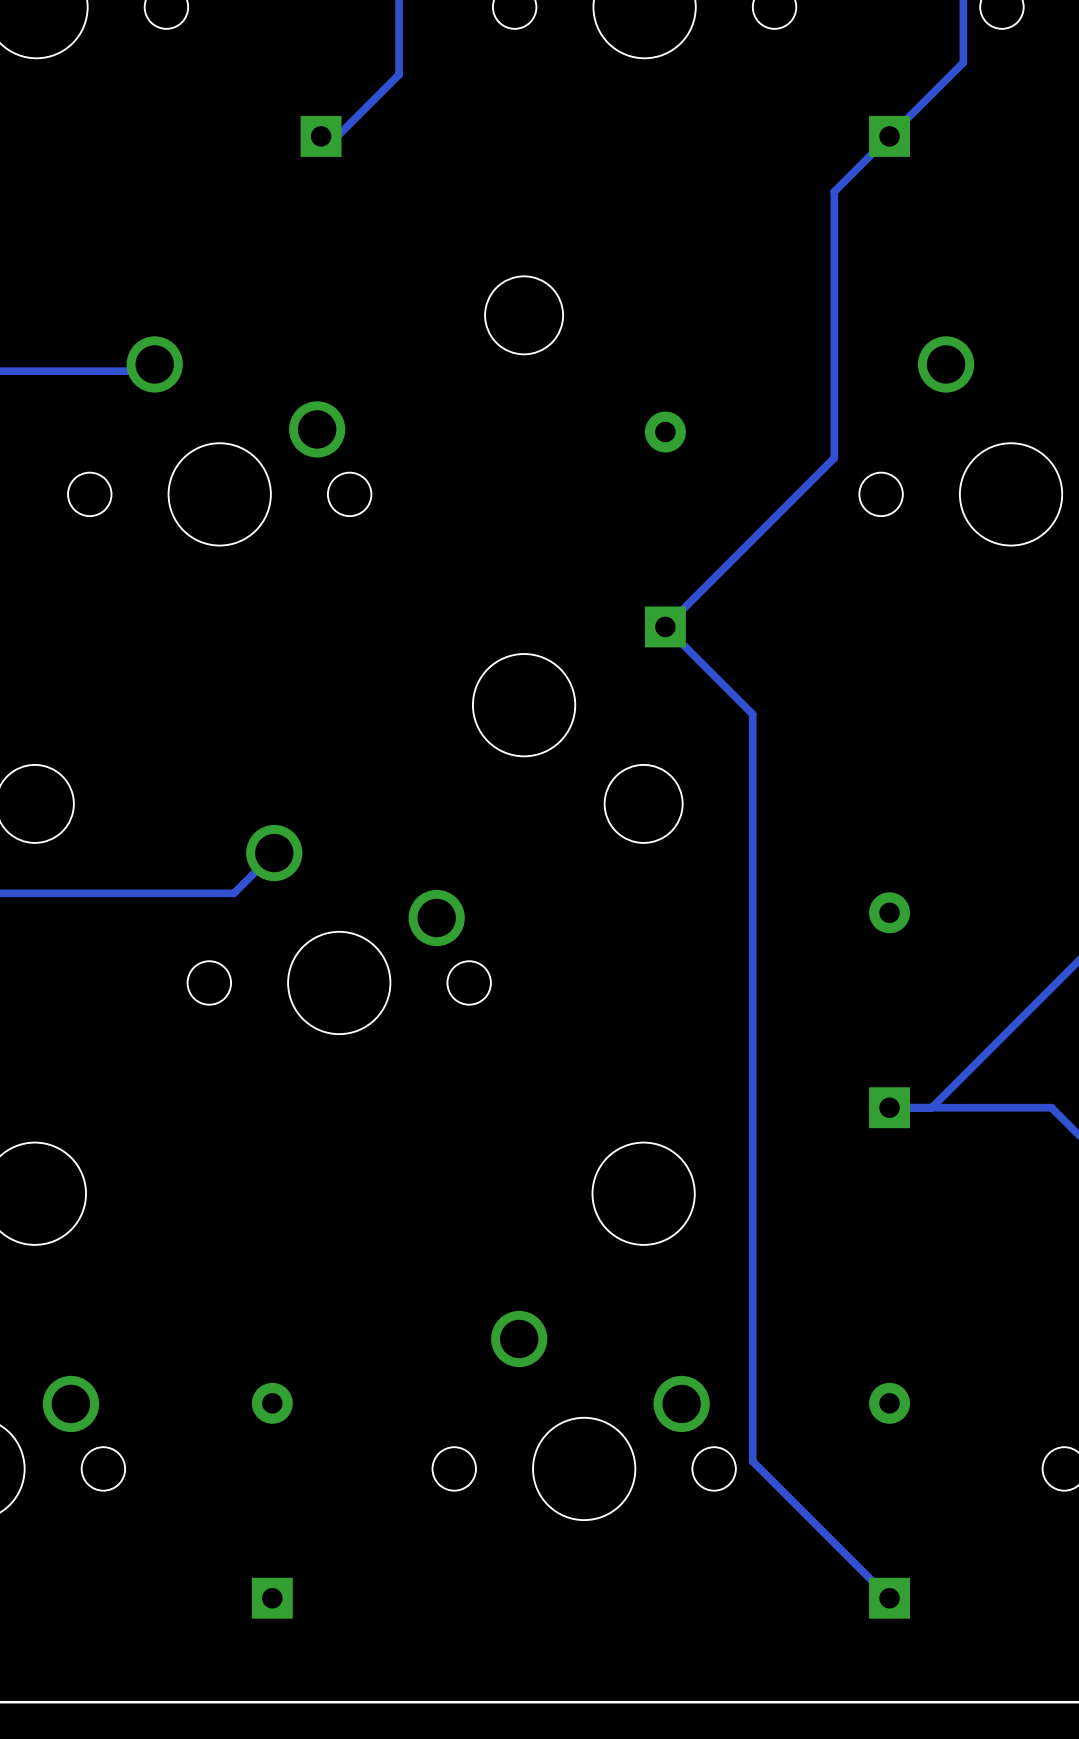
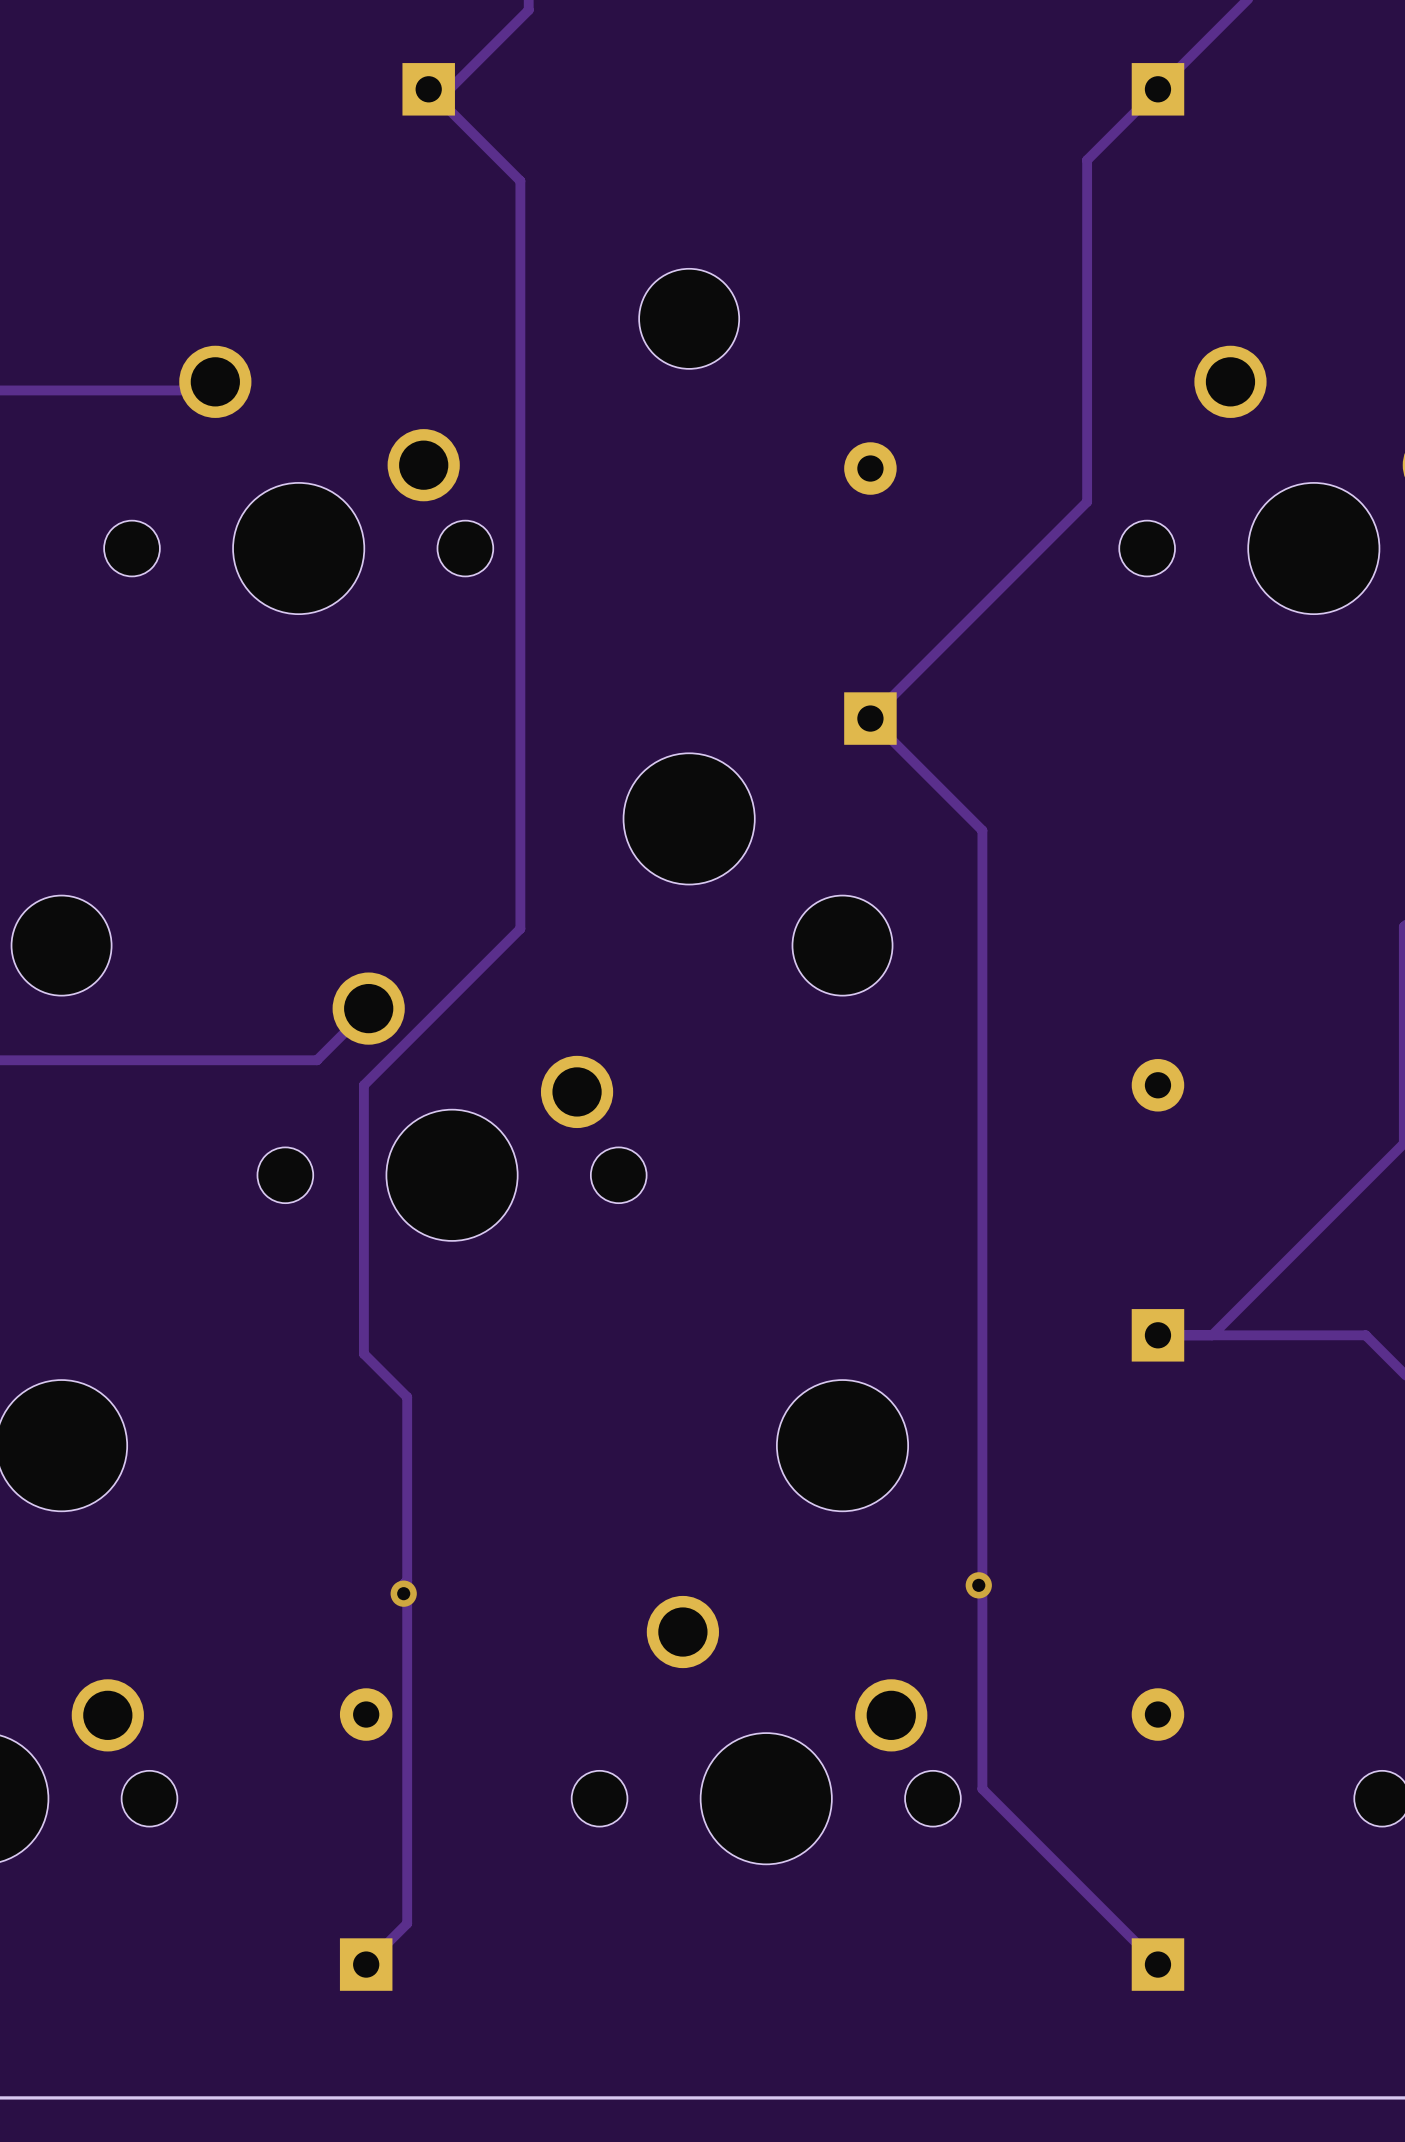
track: none -> (428, 89) (520, 180) (520, 928) (363, 1085) (363, 1353) (407, 1397) (407, 1923) (366, 1964)
via: none -> (978, 1585)
via: none -> (403, 1593)

